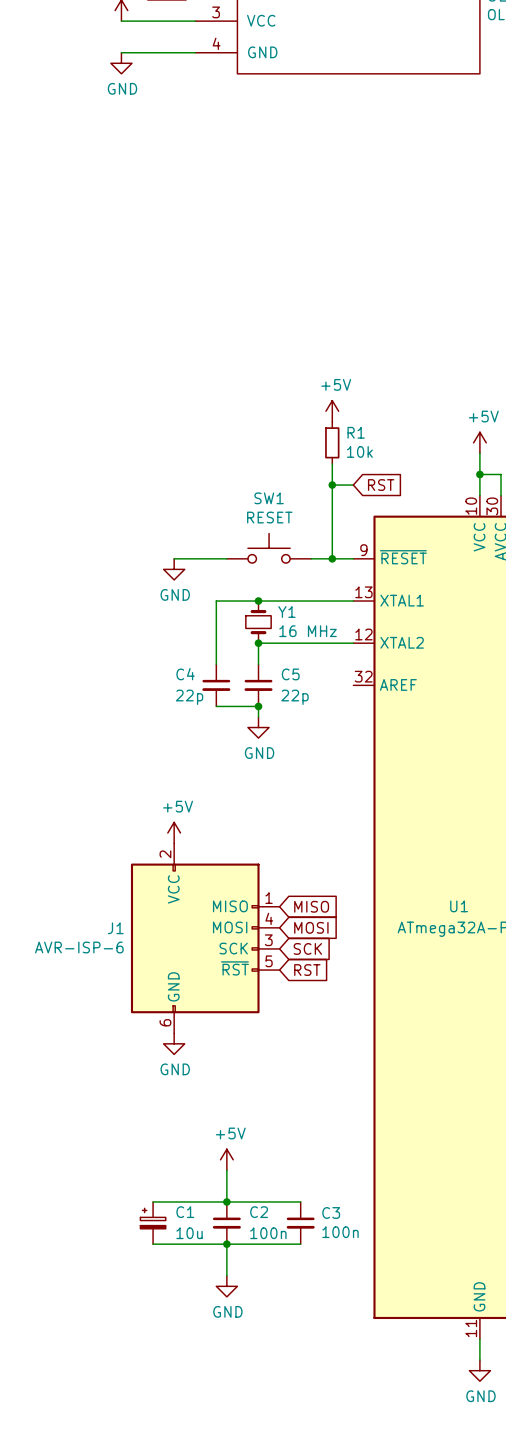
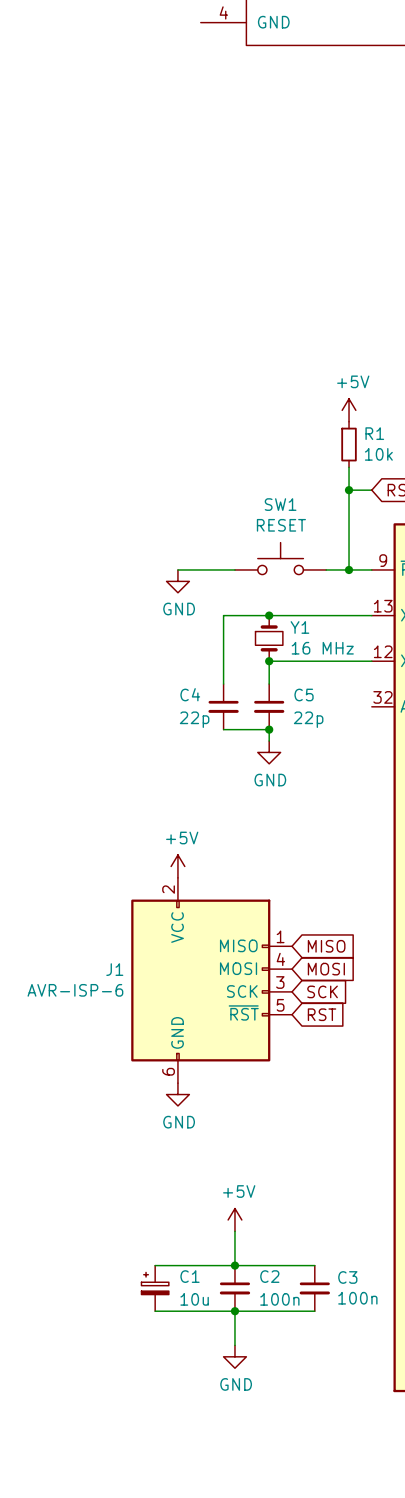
wire: (121, 52) (195, 52) -> none
power symbol: GND (121, 63) -> none

